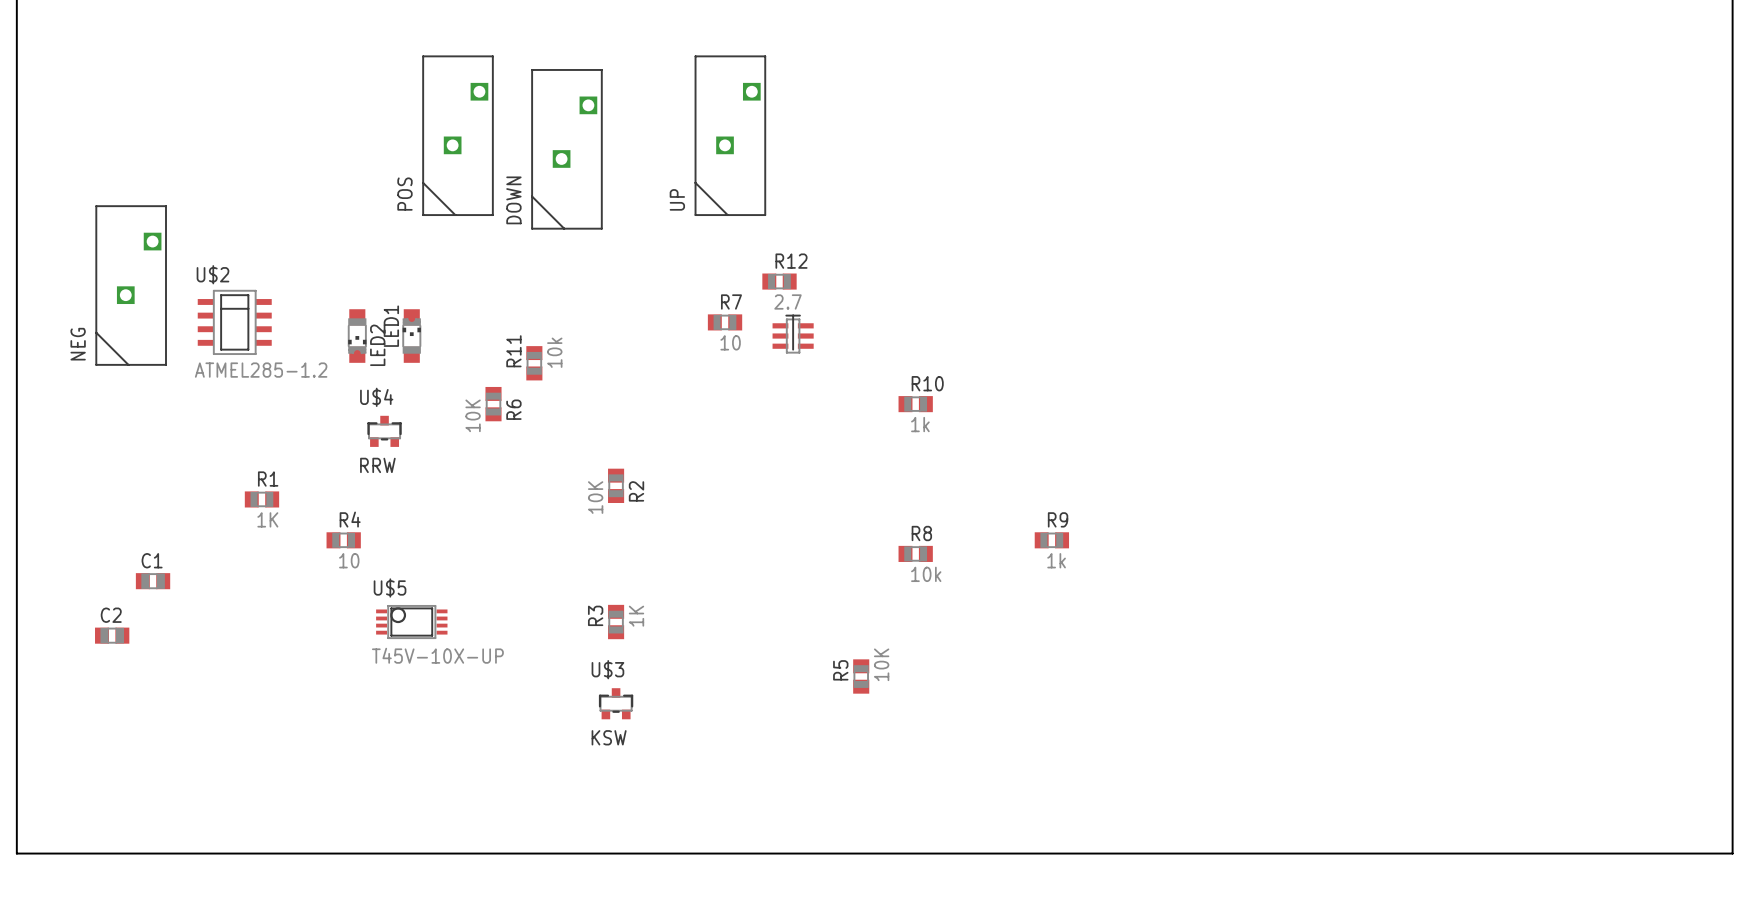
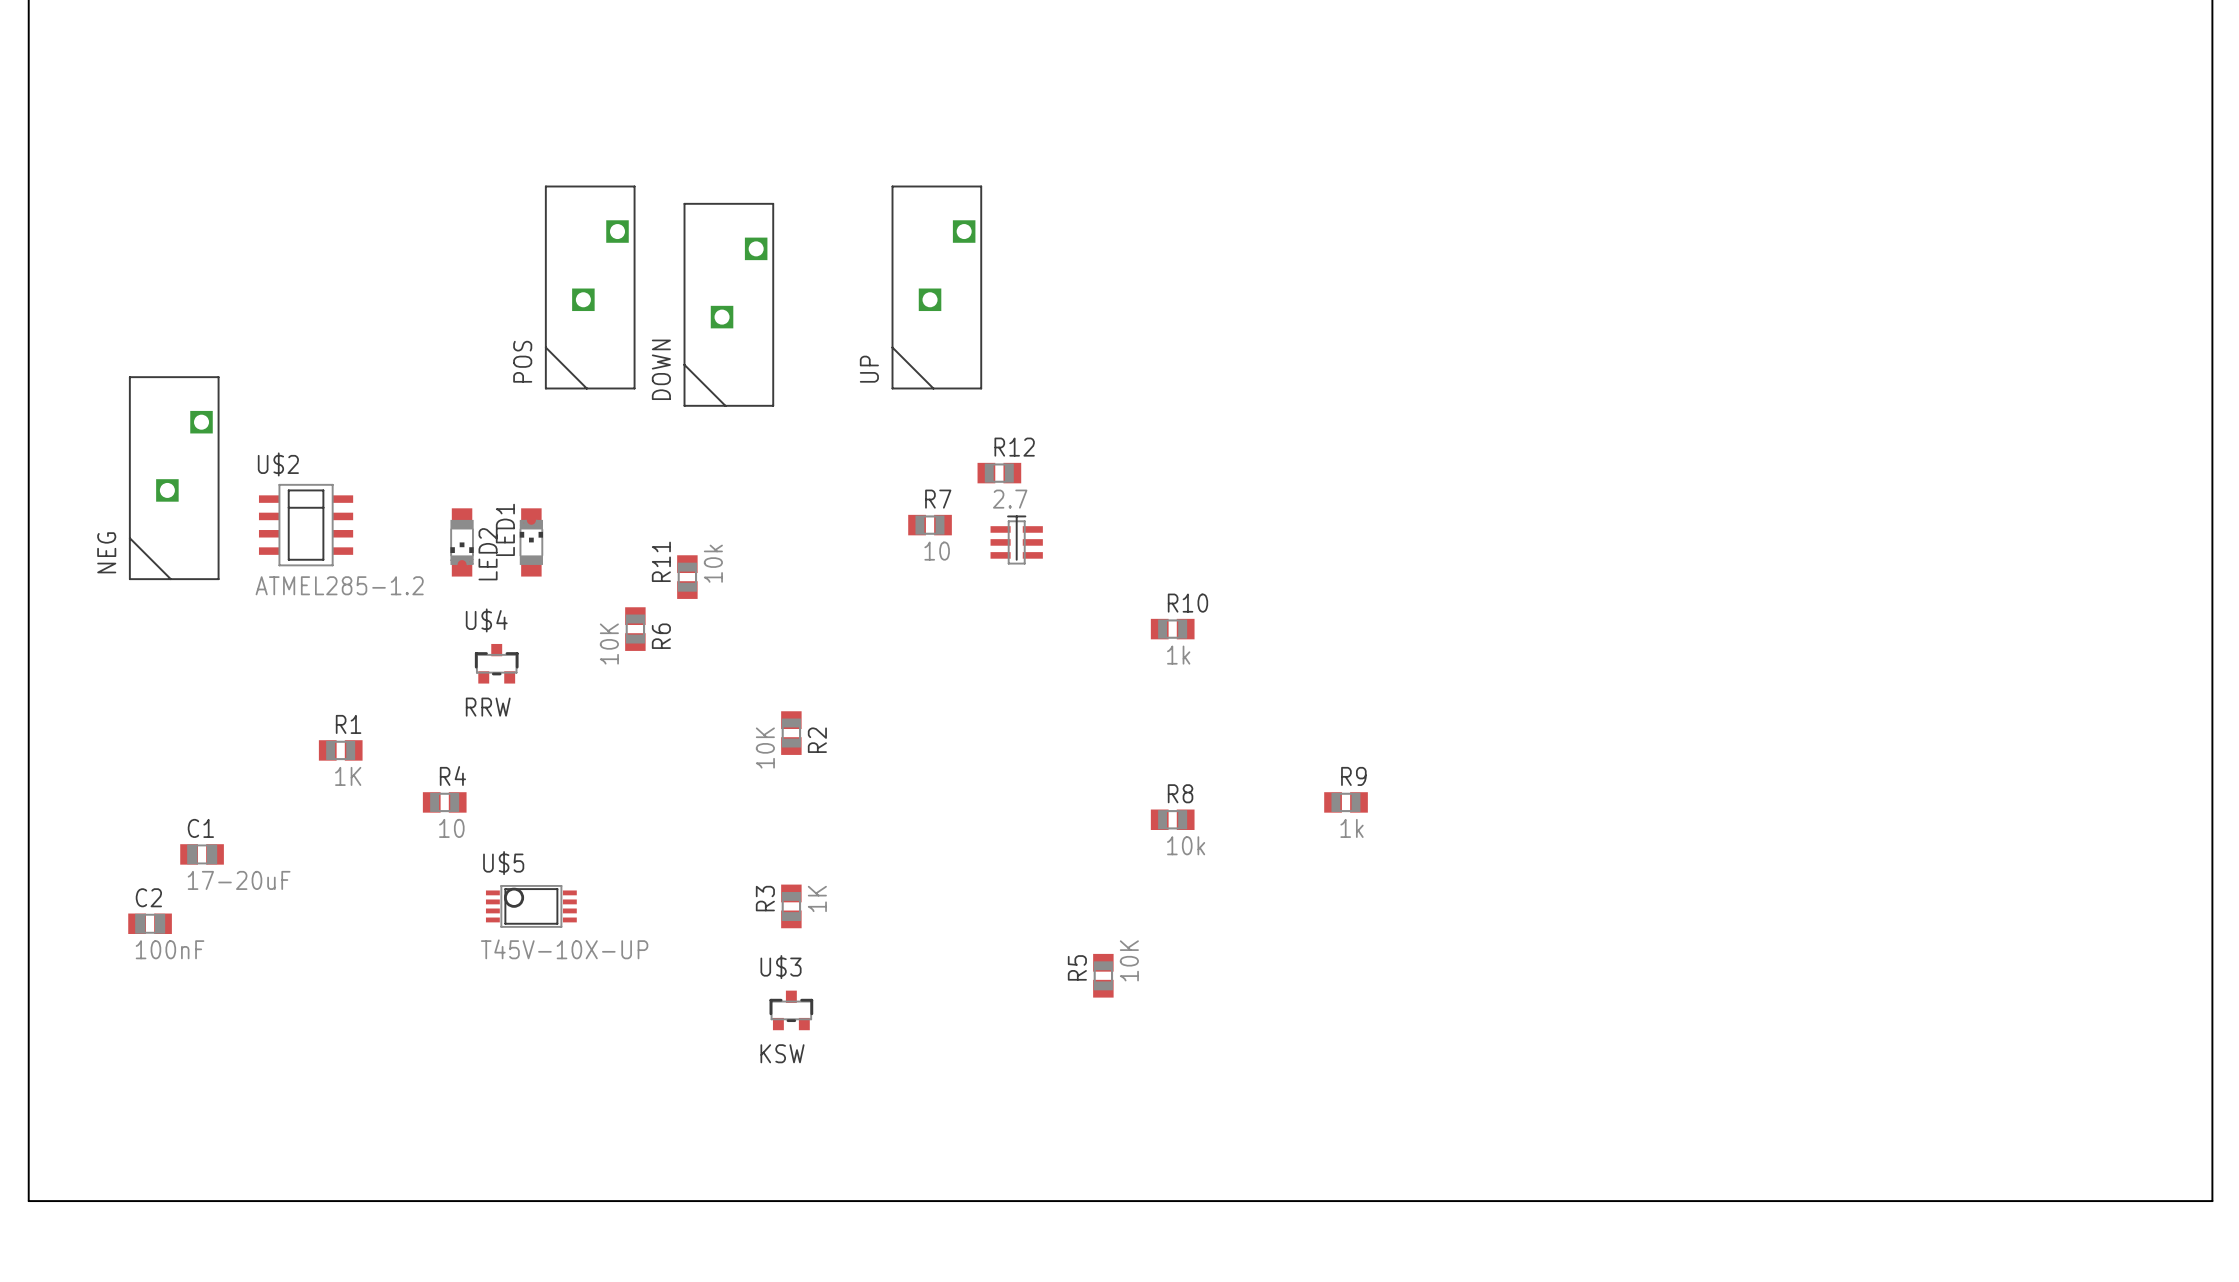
C1 value: none -> 17-20uF (239, 880)
C2 value: none -> 100nF (170, 949)

